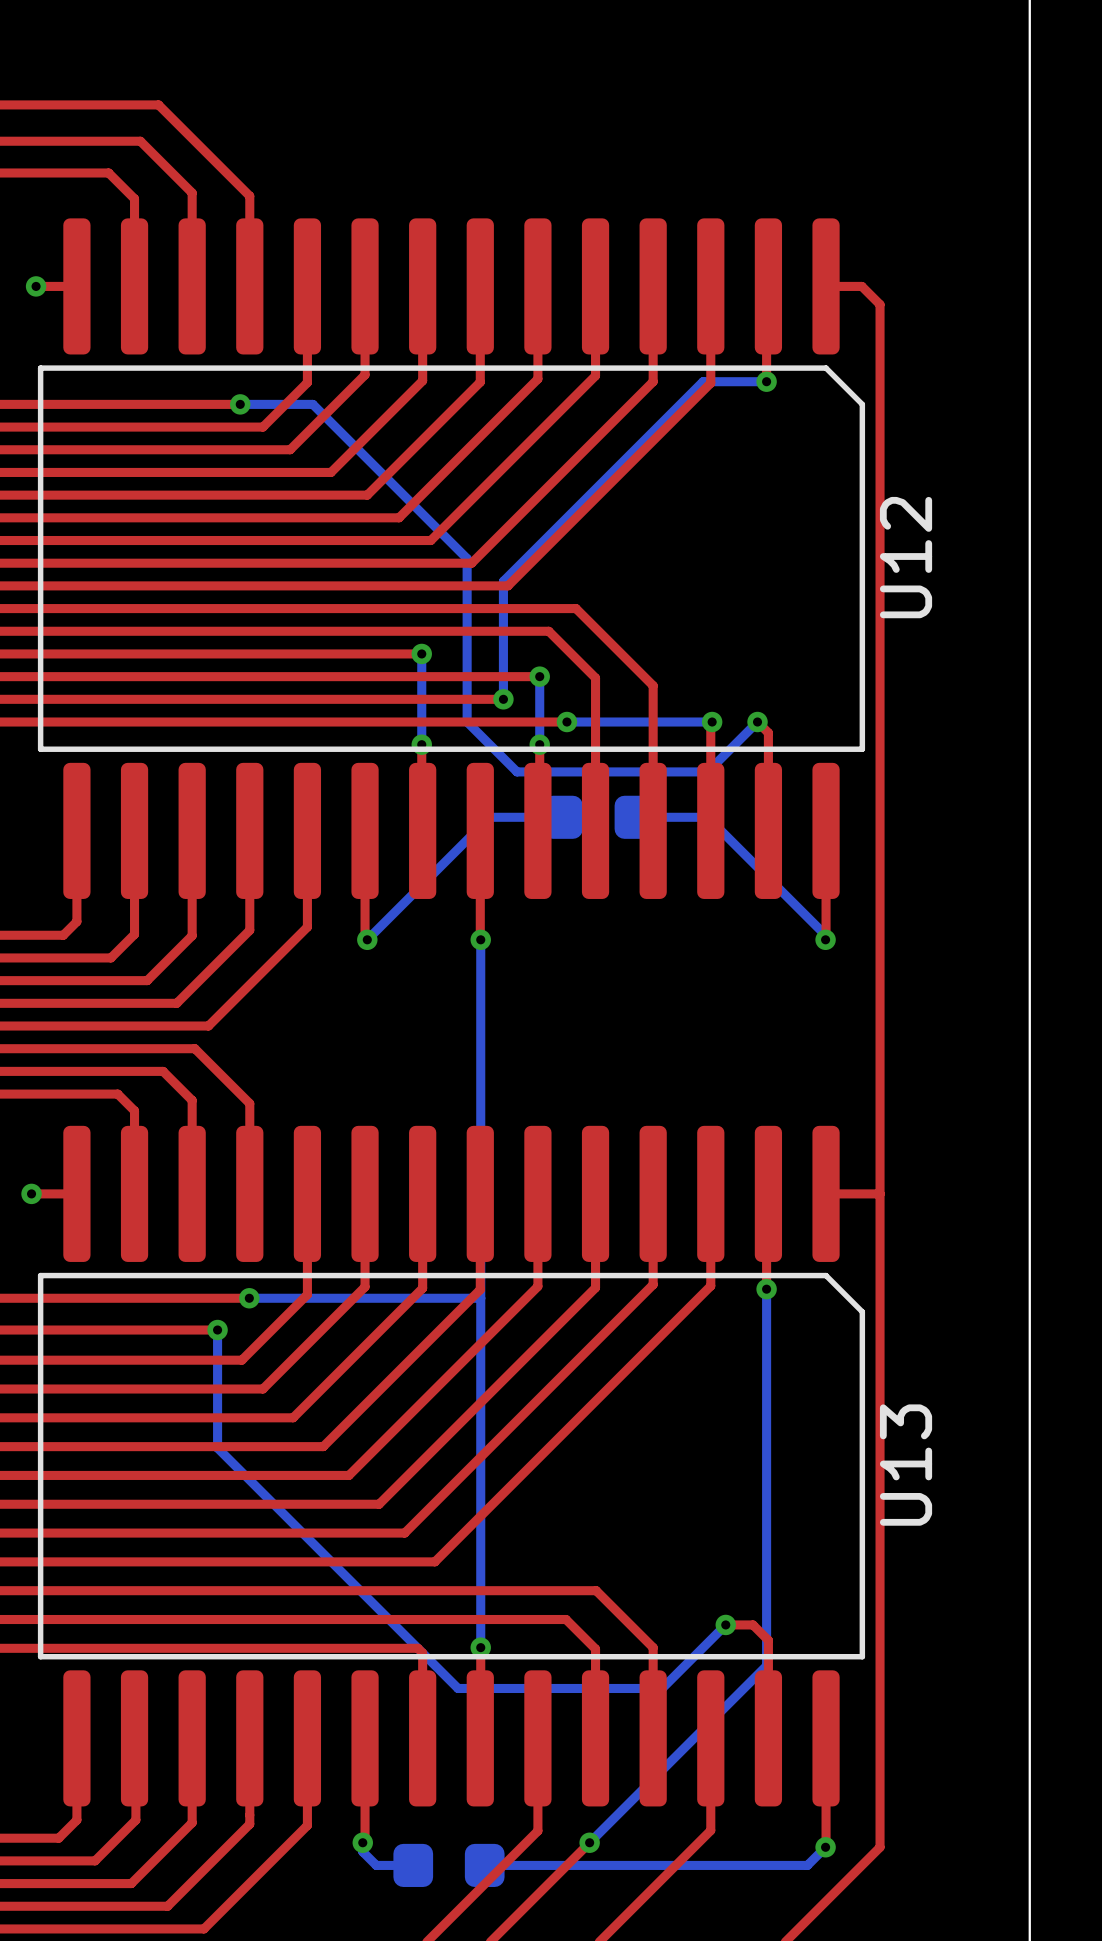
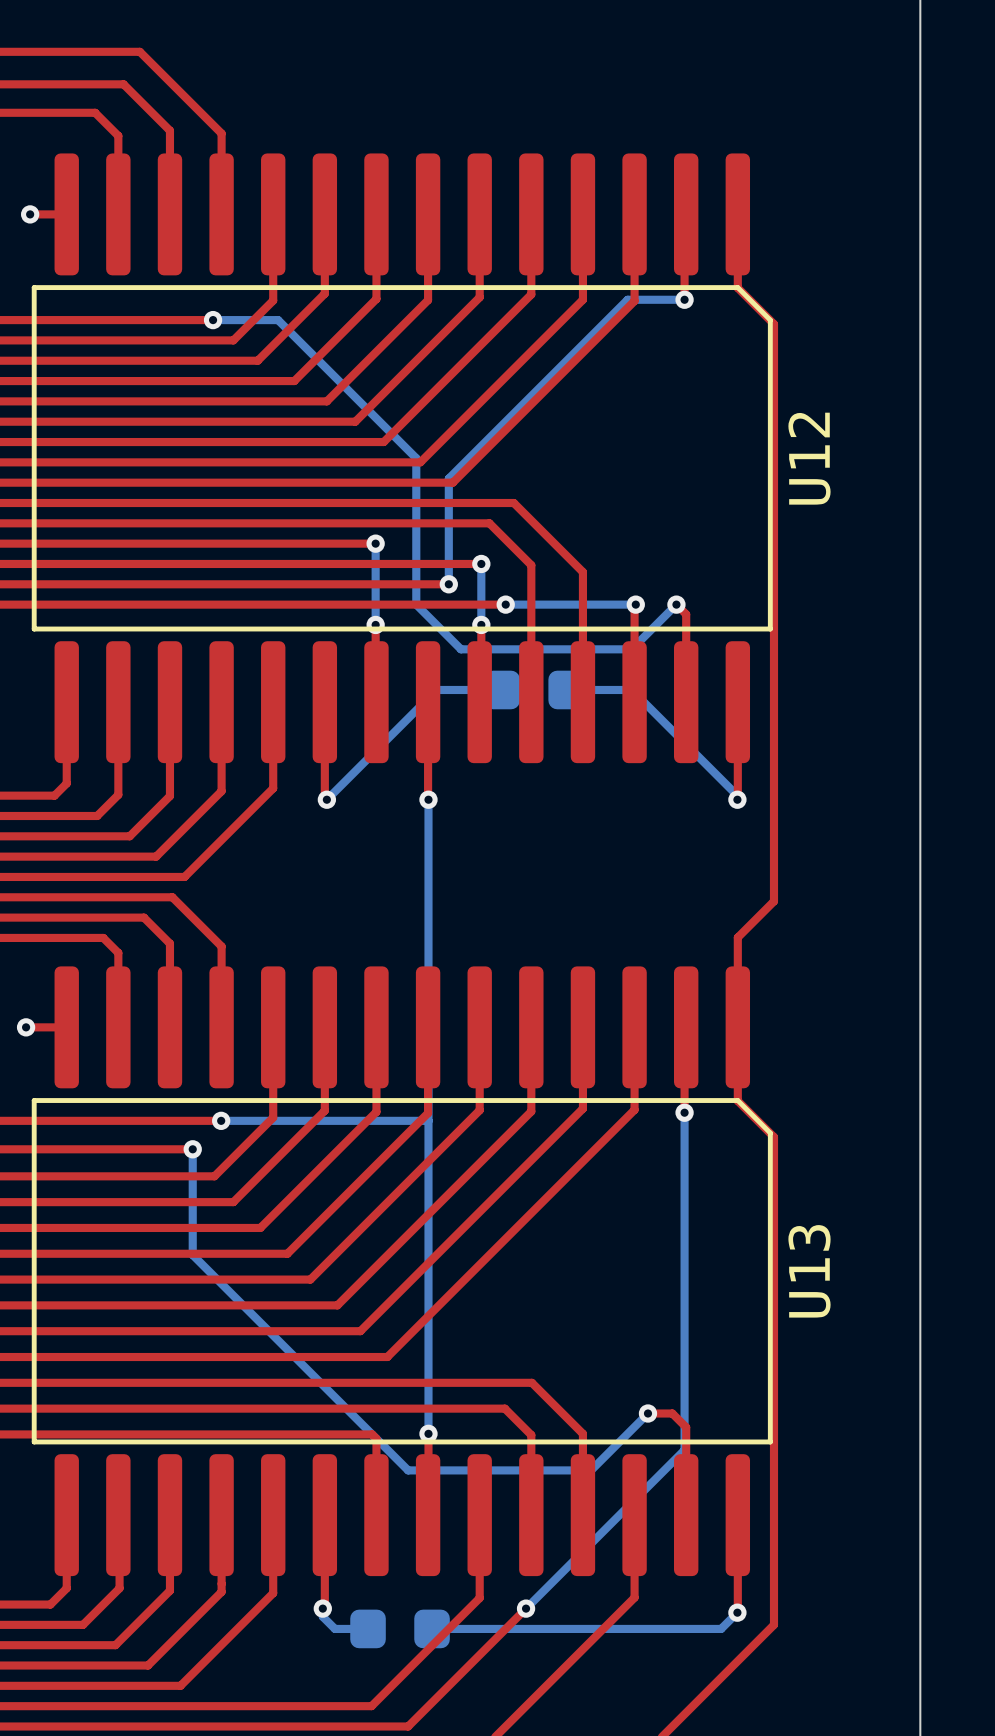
top track: (826, 286) (861, 286) (880, 304) (880, 1847) (866, 1860) -> (737, 214) (737, 287) (773, 324) (773, 901) (737, 937) (737, 1100) (773, 1137) (773, 1624)
top track: (826, 1193) (880, 1193) -> none

